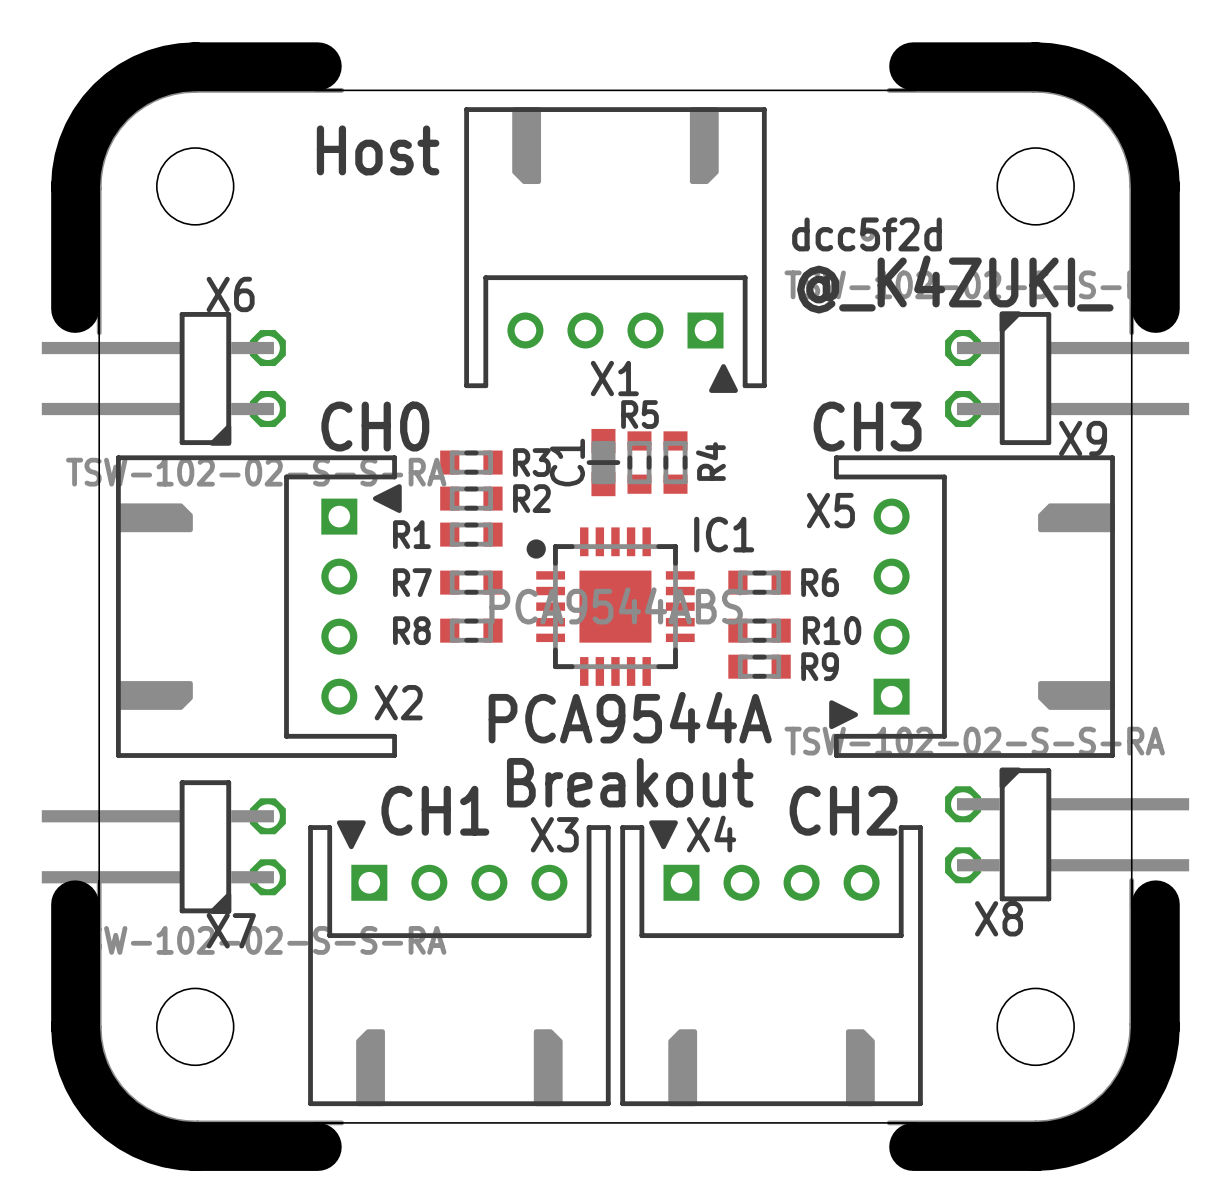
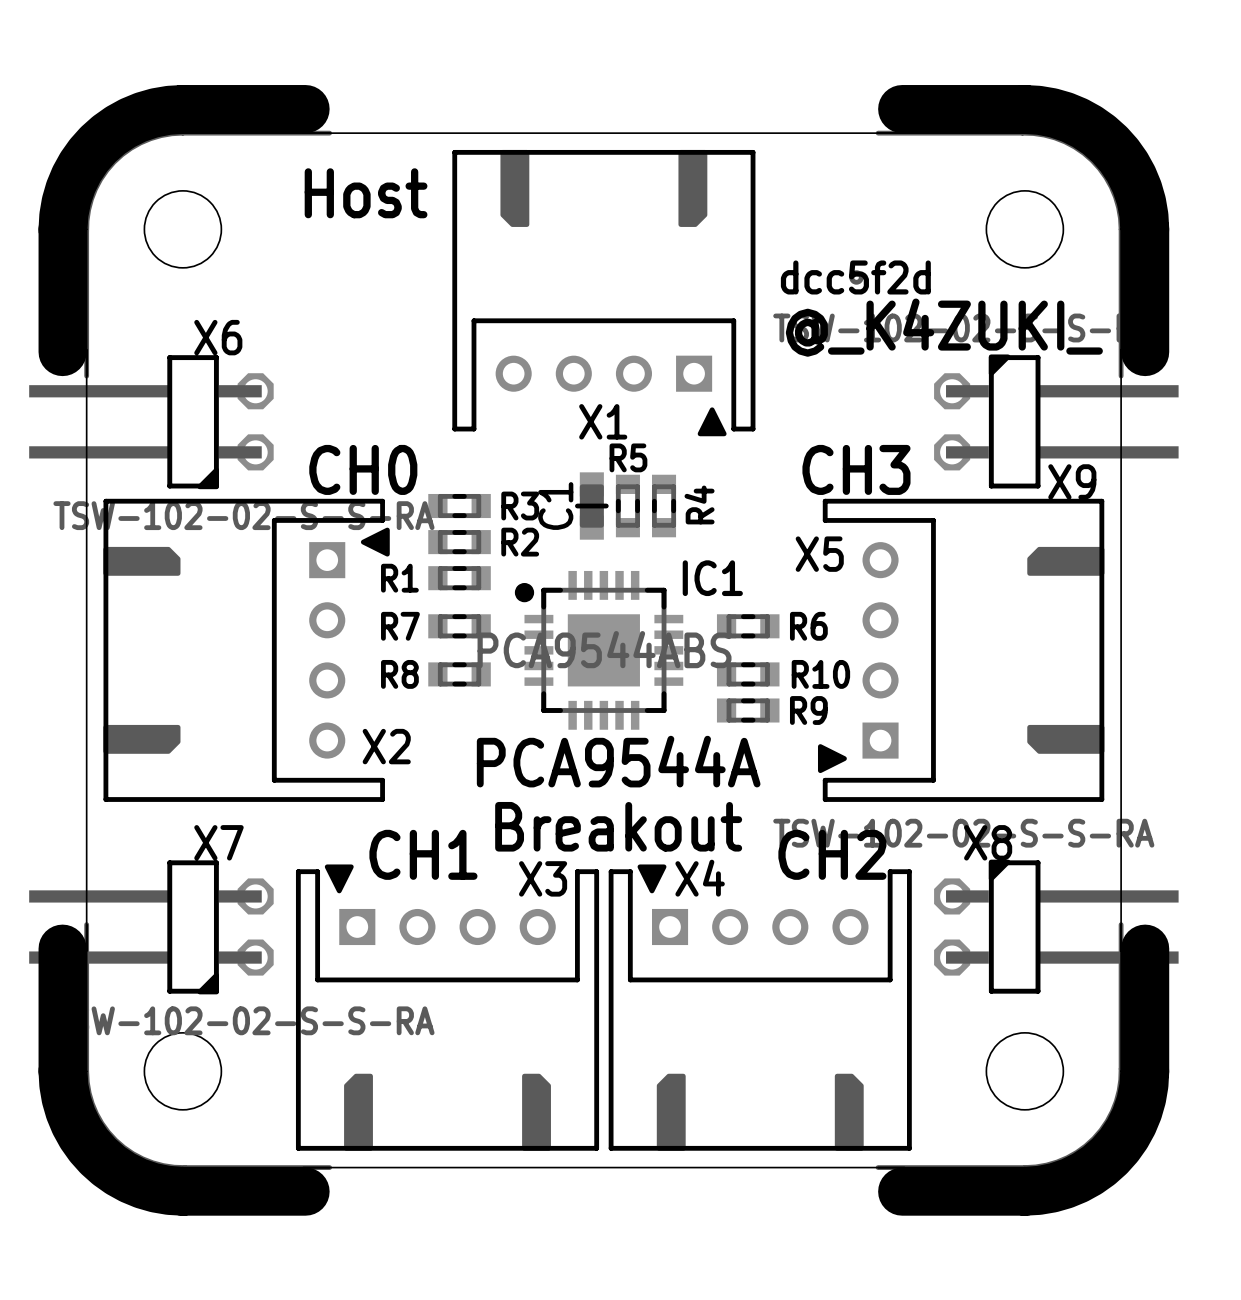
X8 position: (1067, 834) -> (1056, 926)
X7 position: (163, 847) -> (151, 927)
X8 name position: X8 (999, 918) -> X8 (988, 842)
X7 name position: X7 (231, 930) -> X7 (218, 842)

